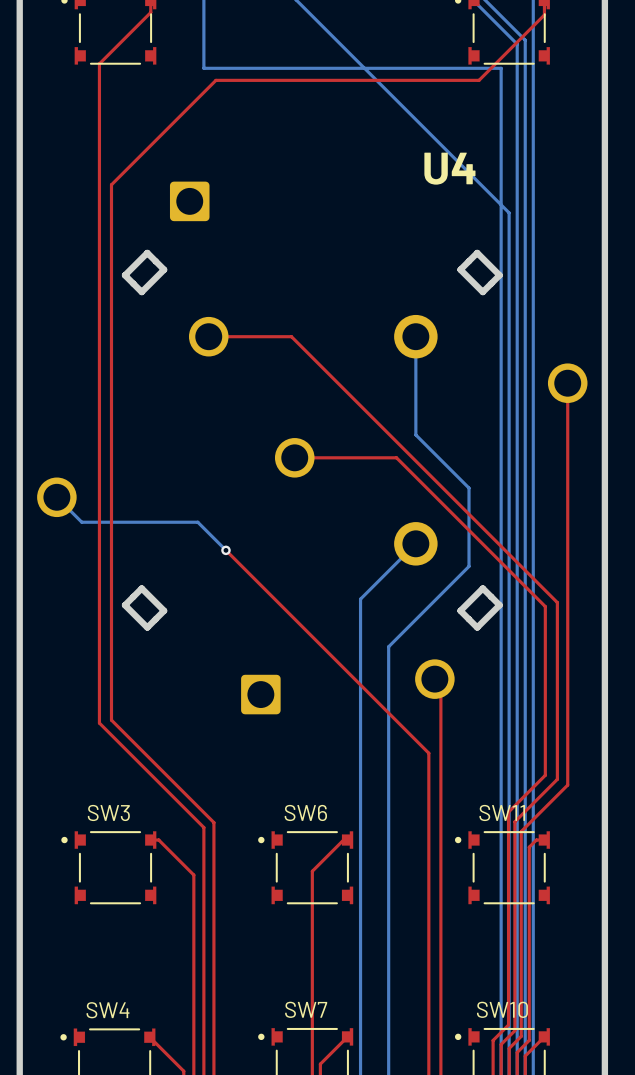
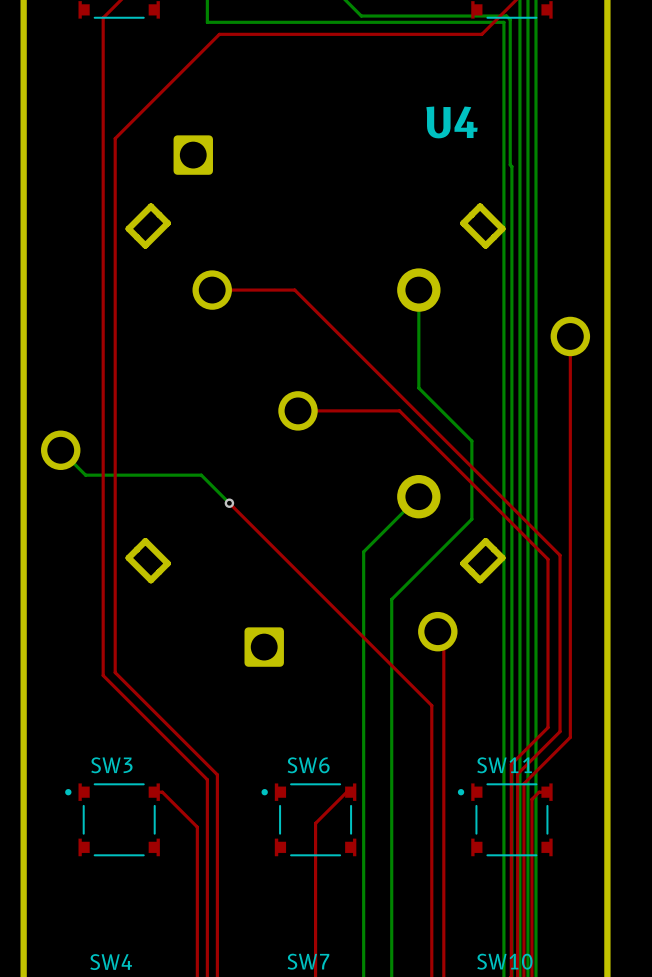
bottom track: (358, 61) (507, 211) -> (361, 16) (506, 16) (510, 19) (510, 164)

